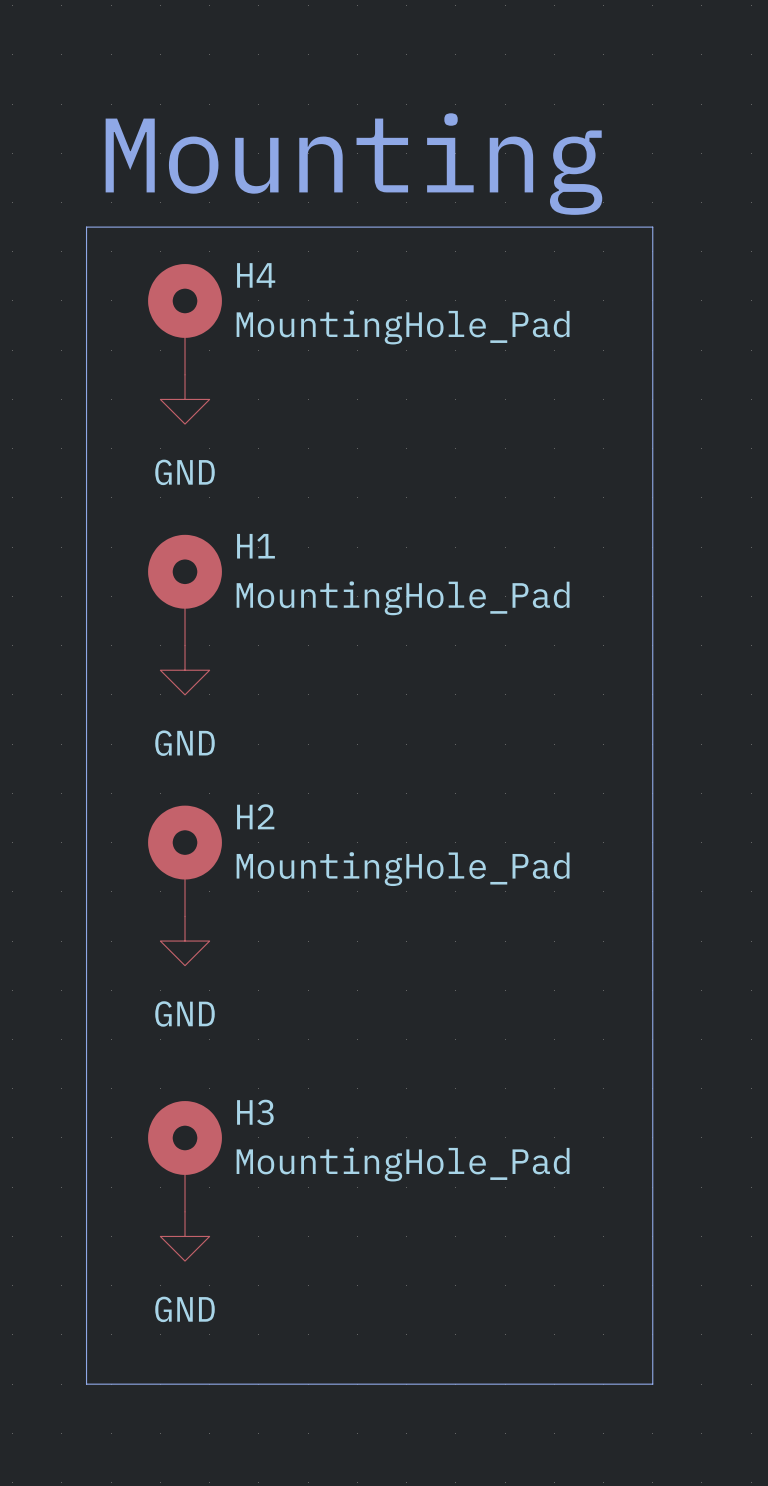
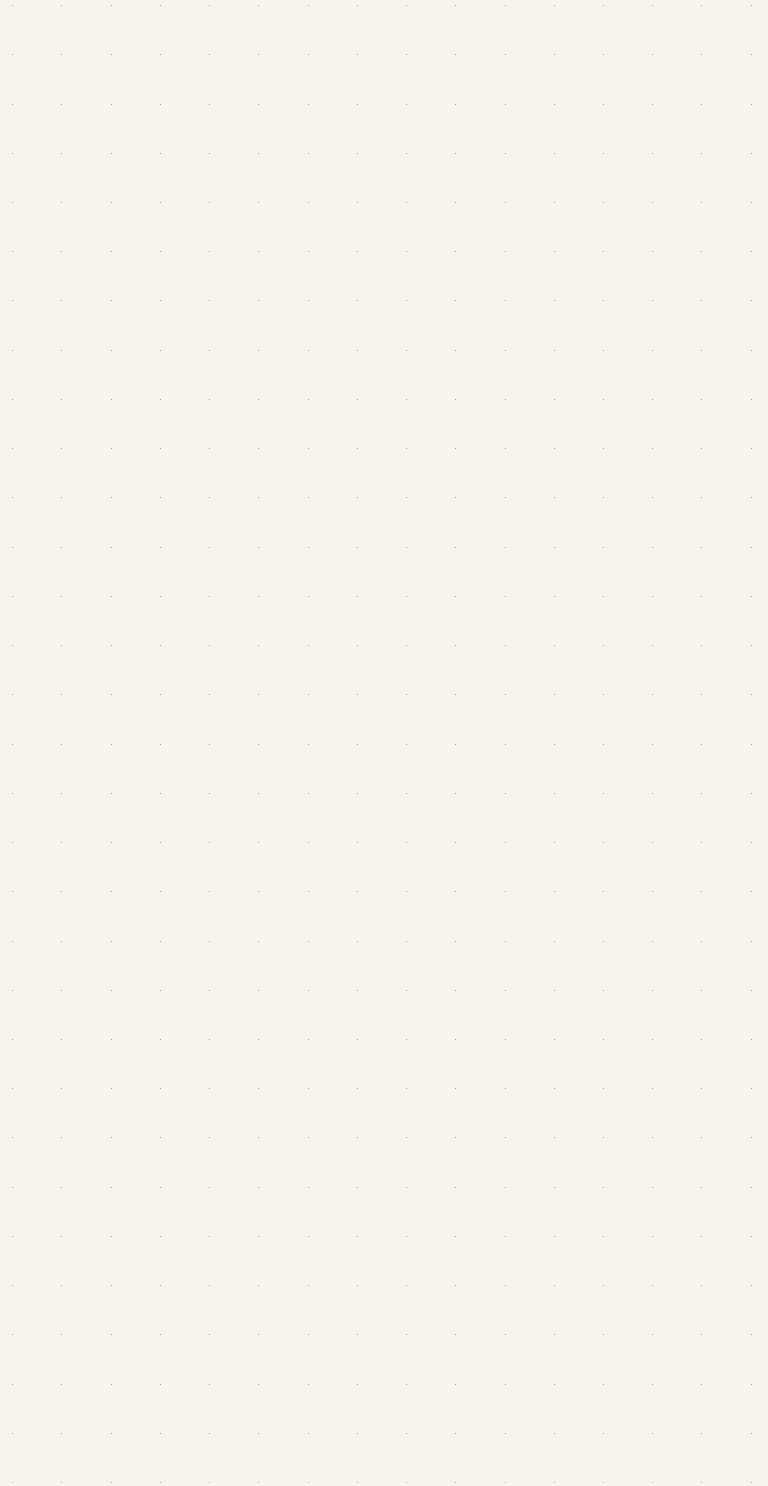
text: Mounting (353, 164) -> none
line: (86, 227) (652, 227) (652, 1384) (86, 1384) (86, 227) -> none
H4: MountingHole_Pad (185, 319) -> none
power symbol: GND (185, 399) -> none
H1: MountingHole_Pad (185, 590) -> none
power symbol: GND (185, 670) -> none
H2: MountingHole_Pad (185, 861) -> none
power symbol: GND (185, 941) -> none
H3: MountingHole_Pad (185, 1156) -> none
power symbol: GND (185, 1236) -> none

